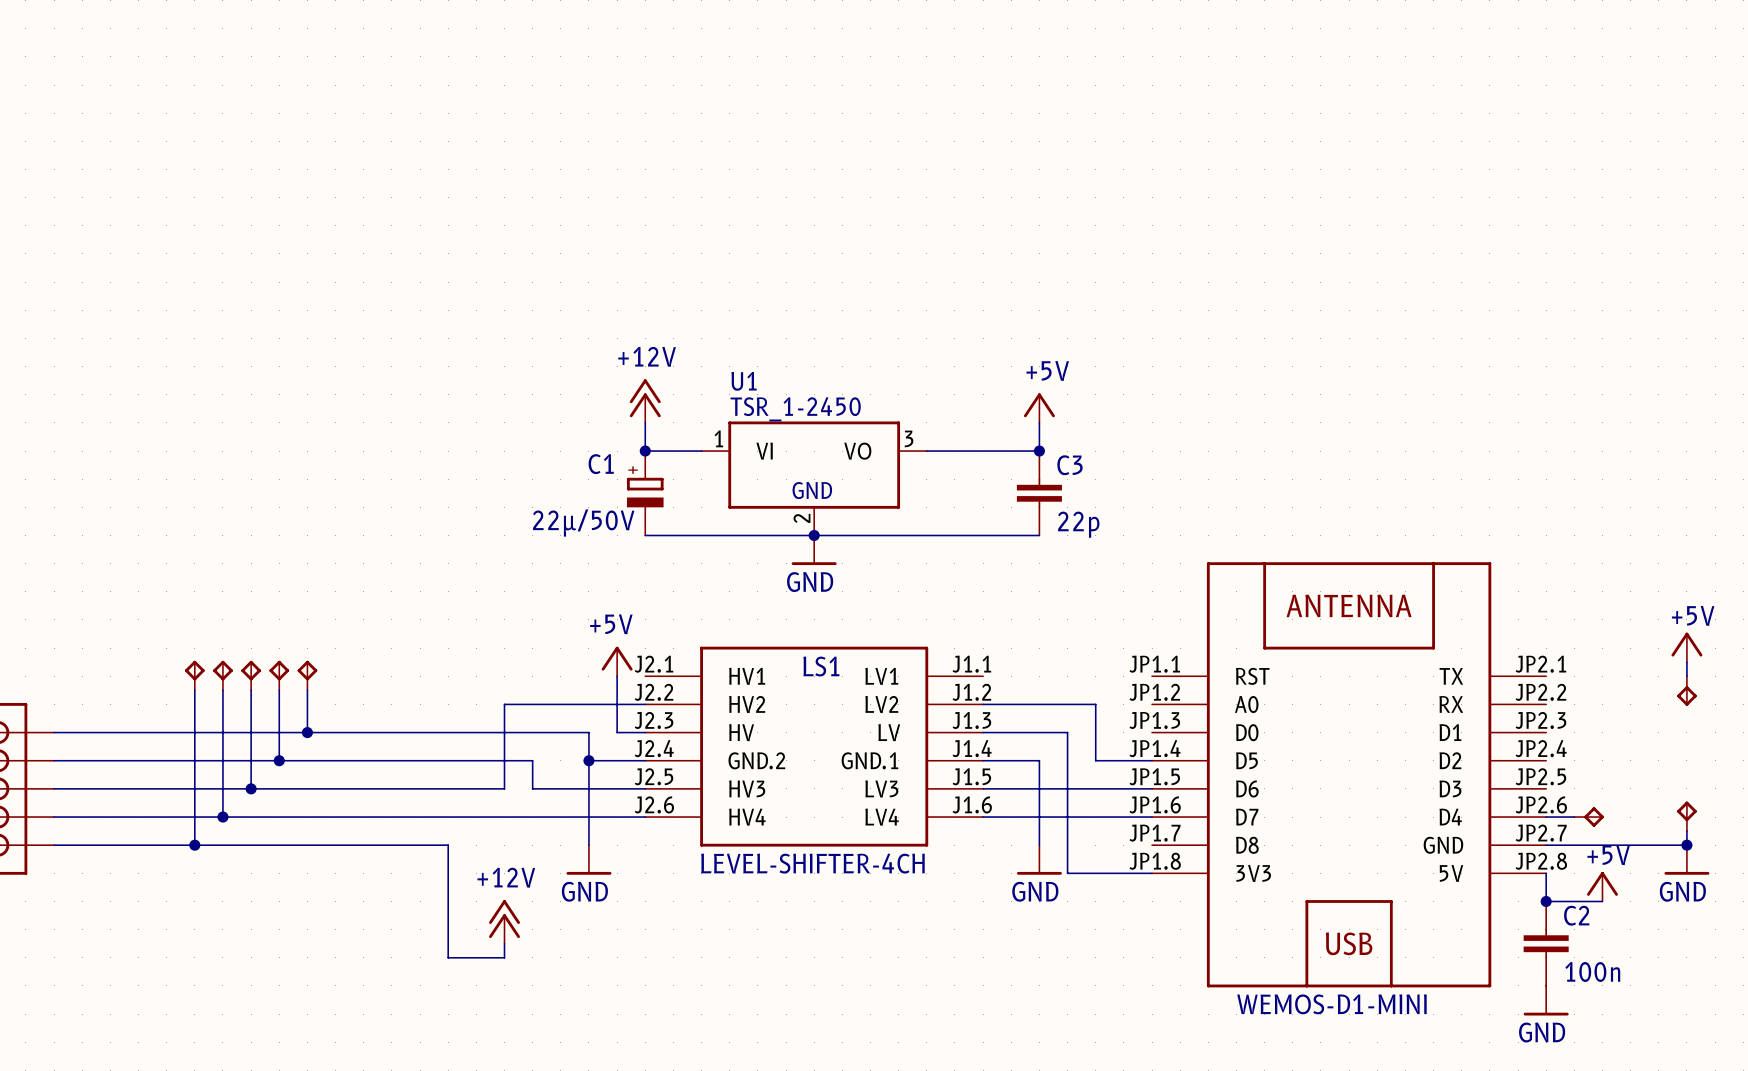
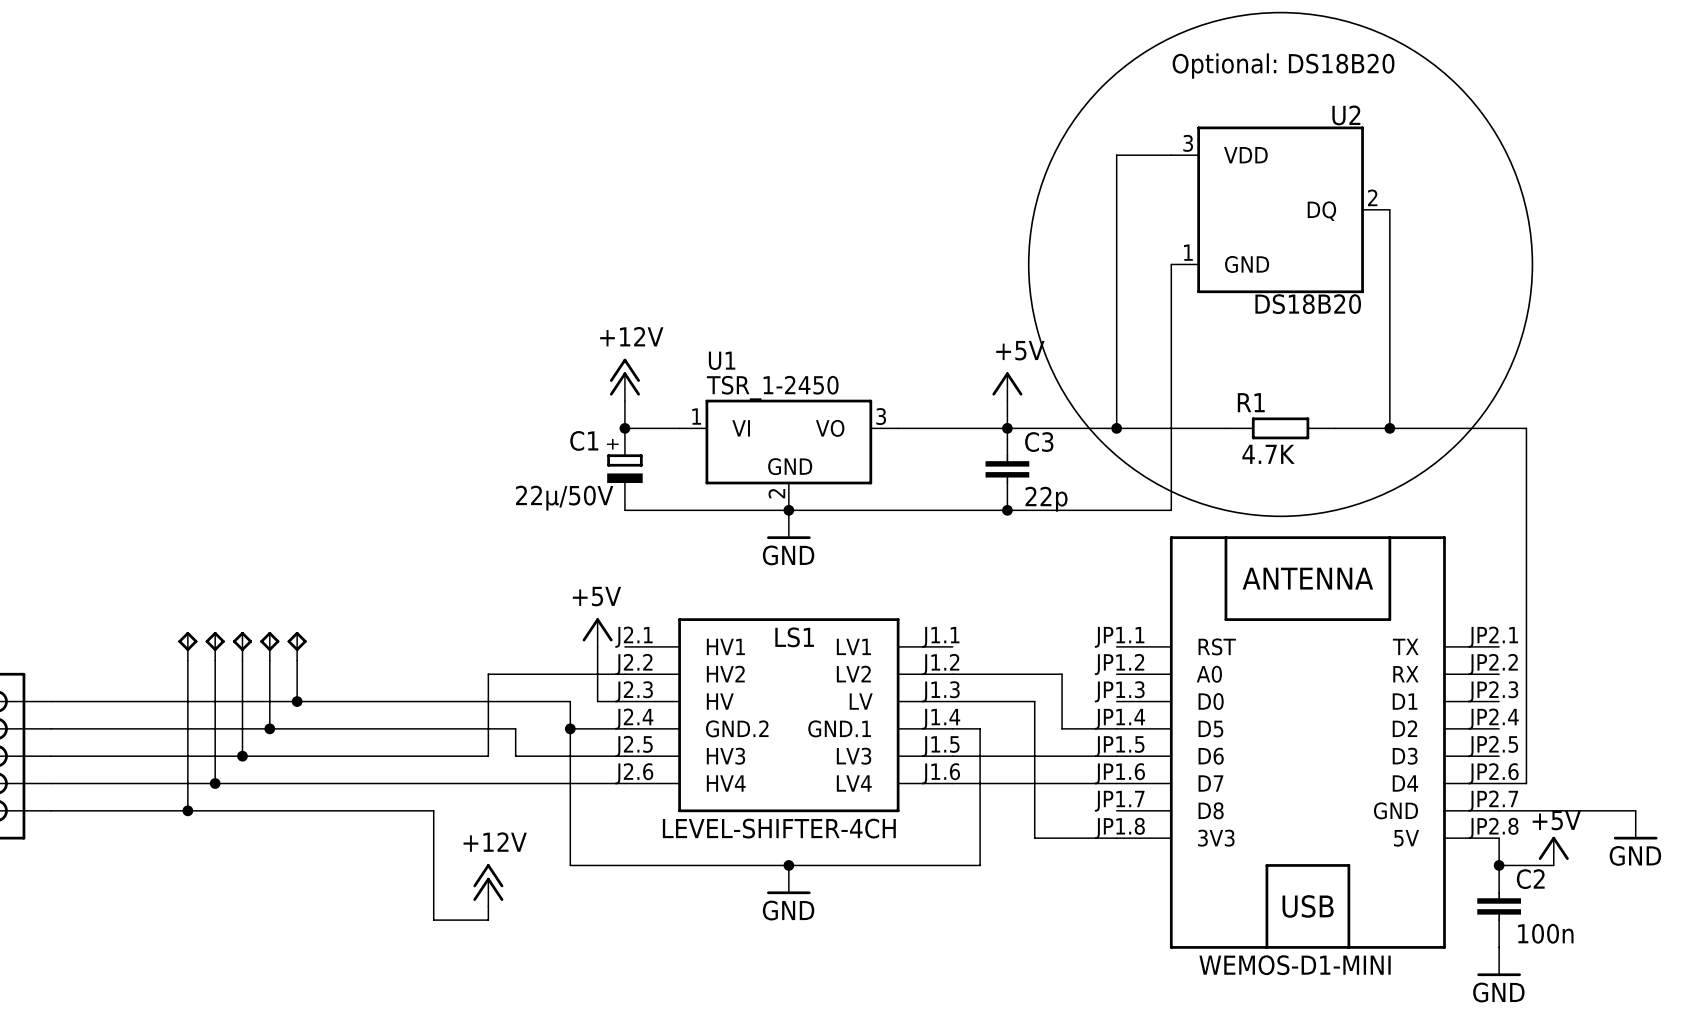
drawing: none -> [1027, 11, 1534, 518]
text: none -> Optional: DS18B20 (1283, 66)
wire: none -> (1171, 155) (1116, 155) (1116, 428)
U2: none -> DS18B20 (1280, 209)
wire: none -> (1389, 209) (1389, 428)
wire: none -> (1171, 264) (1171, 510) (1007, 510)
wire: none -> (1007, 428) (1225, 428)
junction: none -> (1116, 428)
R1: none -> 4.7K (1280, 428)
wire: none -> (1335, 428) (1526, 428) (1526, 783)
junction: none -> (1389, 428)
junction: none -> (1007, 510)
power symbol: +5V (1686, 647) -> none
wire: (1686, 662) (1686, 676) -> none
part: (1686, 691) -> none
wire: (1011, 760) (1039, 760) (1039, 845) -> (980, 728) (980, 865) (570, 865) (570, 810)
part: (1686, 816) -> none
part: (1589, 817) -> none
wire: (1686, 831) (1686, 845) -> none
junction: (1686, 845) -> none
power symbol: GND (588, 859) -> none
power symbol: GND (1039, 859) -> none
junction: none -> (788, 865)
power symbol: none -> GND (788, 879)

